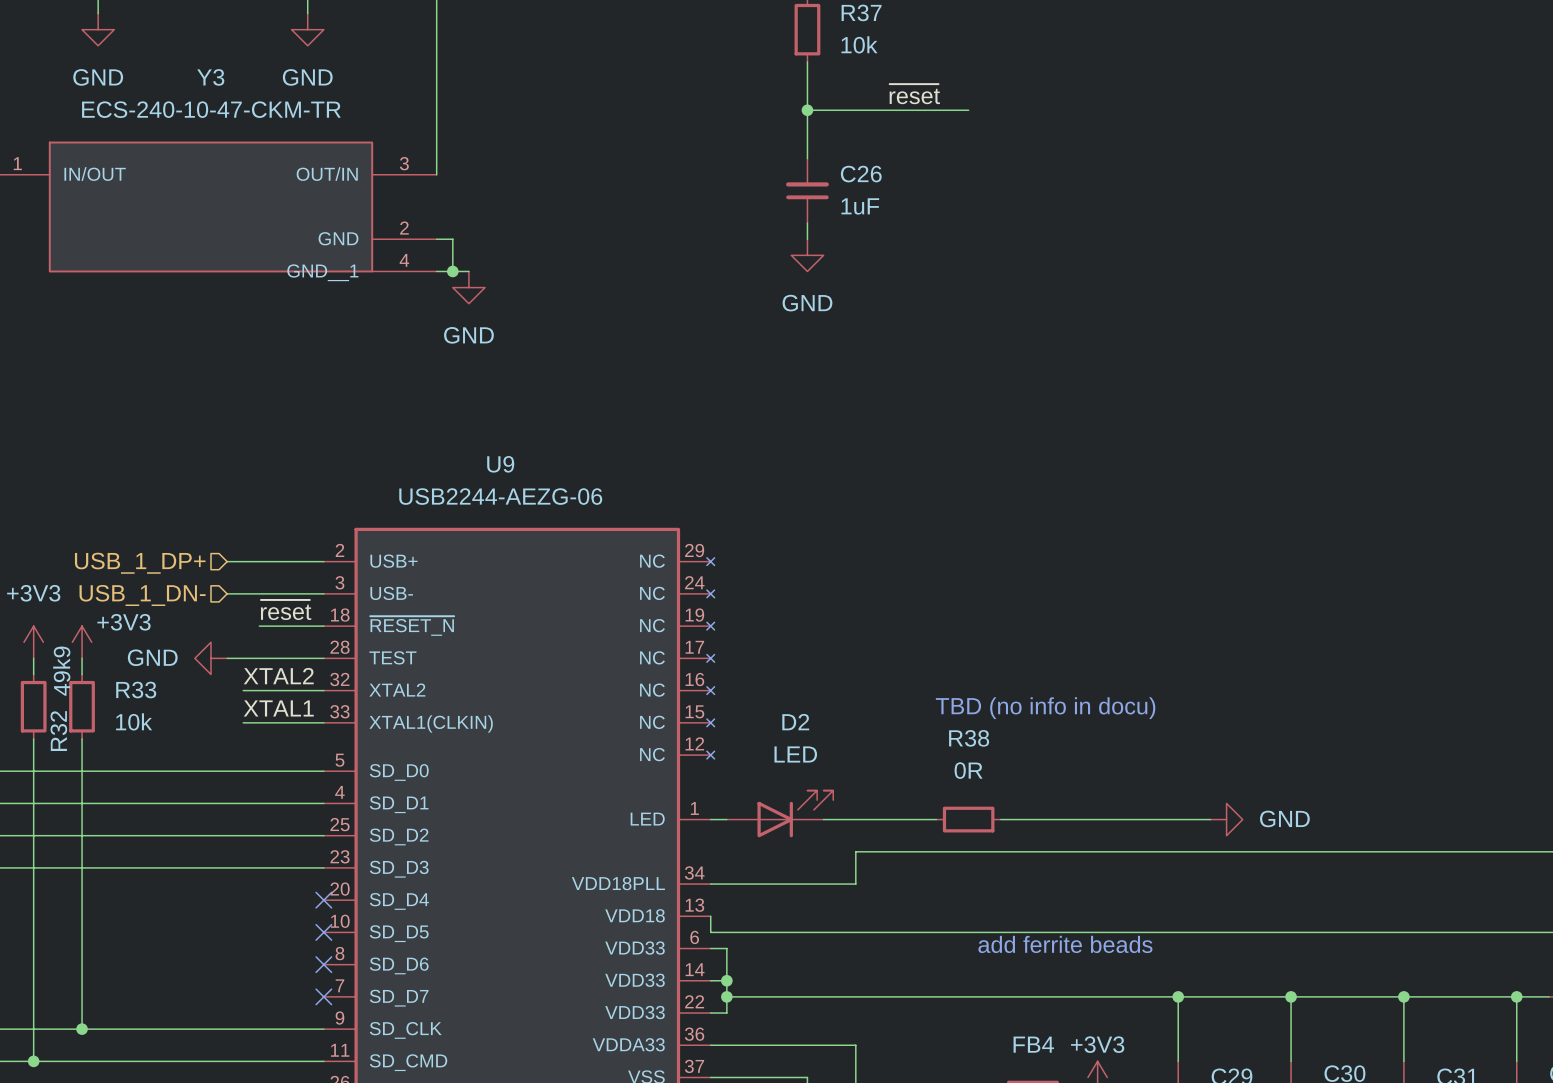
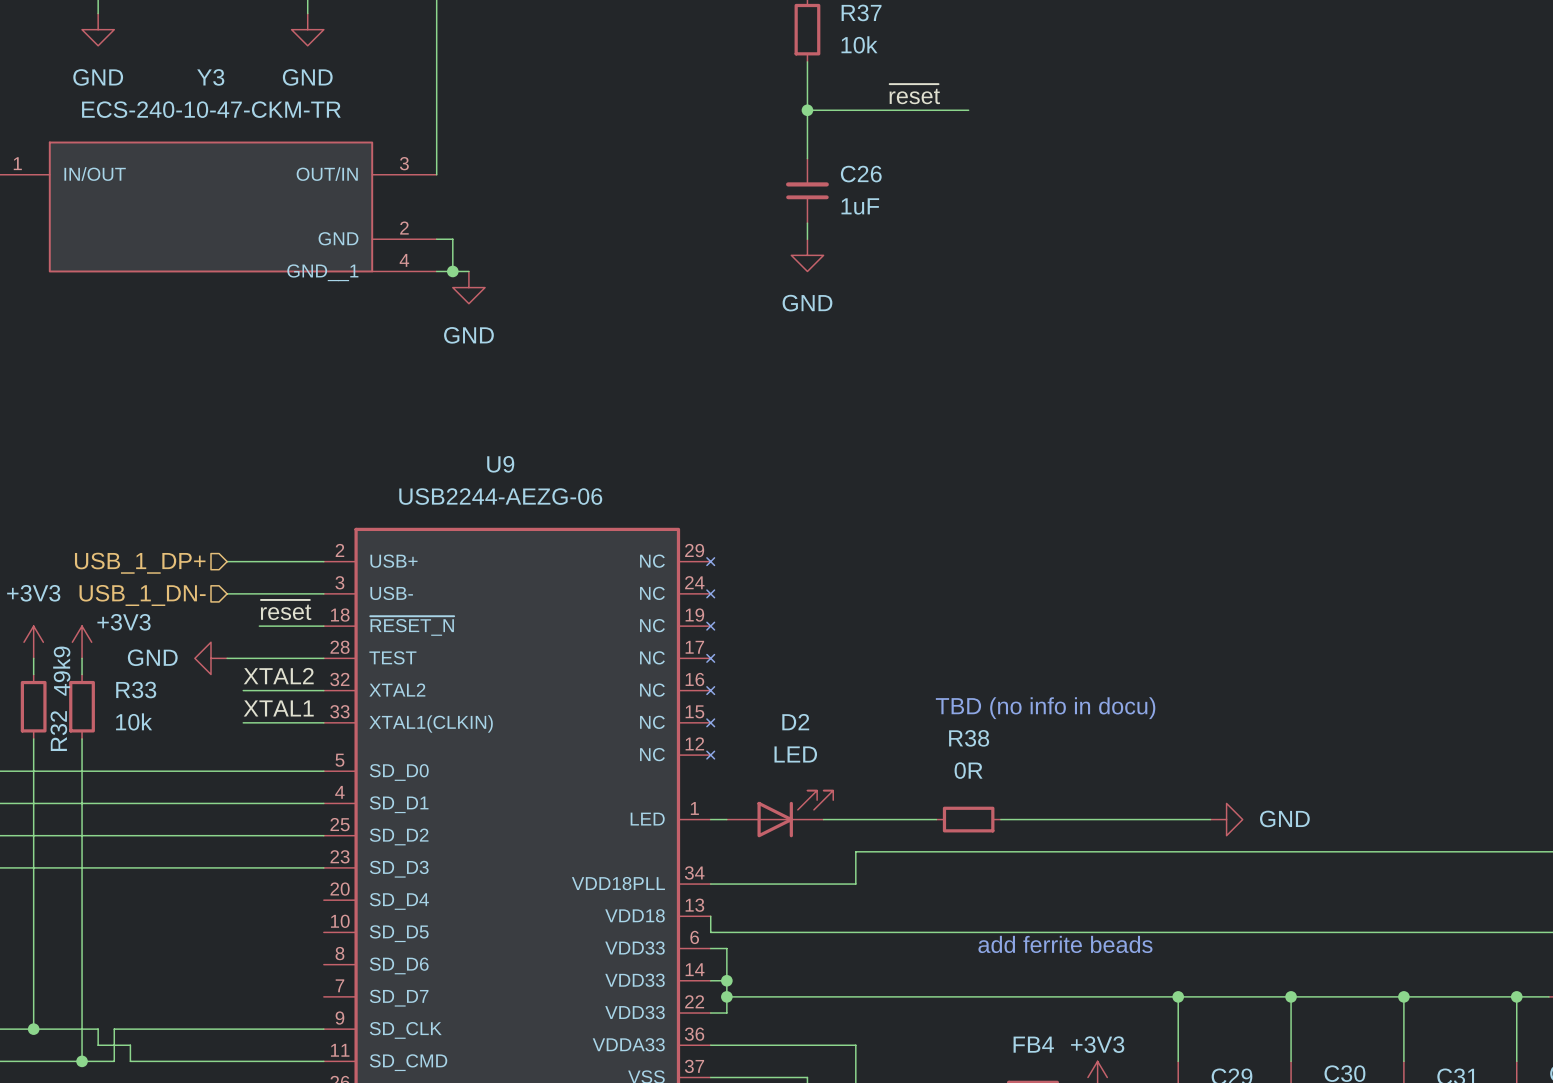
no-connect mark: (323, 900) -> none
no-connect mark: (323, 932) -> none
no-connect mark: (323, 964) -> none
no-connect mark: (323, 996) -> none
wire: (33, 1029) (33, 1061) -> (82, 1029) (82, 1061)
junction: none -> (33, 1029)
junction: (82, 1029) -> none
wire: (98, 1029) (114, 1029) -> (114, 1061) (114, 1029)
junction: (33, 1061) -> none
junction: none -> (82, 1061)
wire: (114, 1061) (130, 1061) -> (98, 1029) (98, 1045) (130, 1045) (130, 1061)

